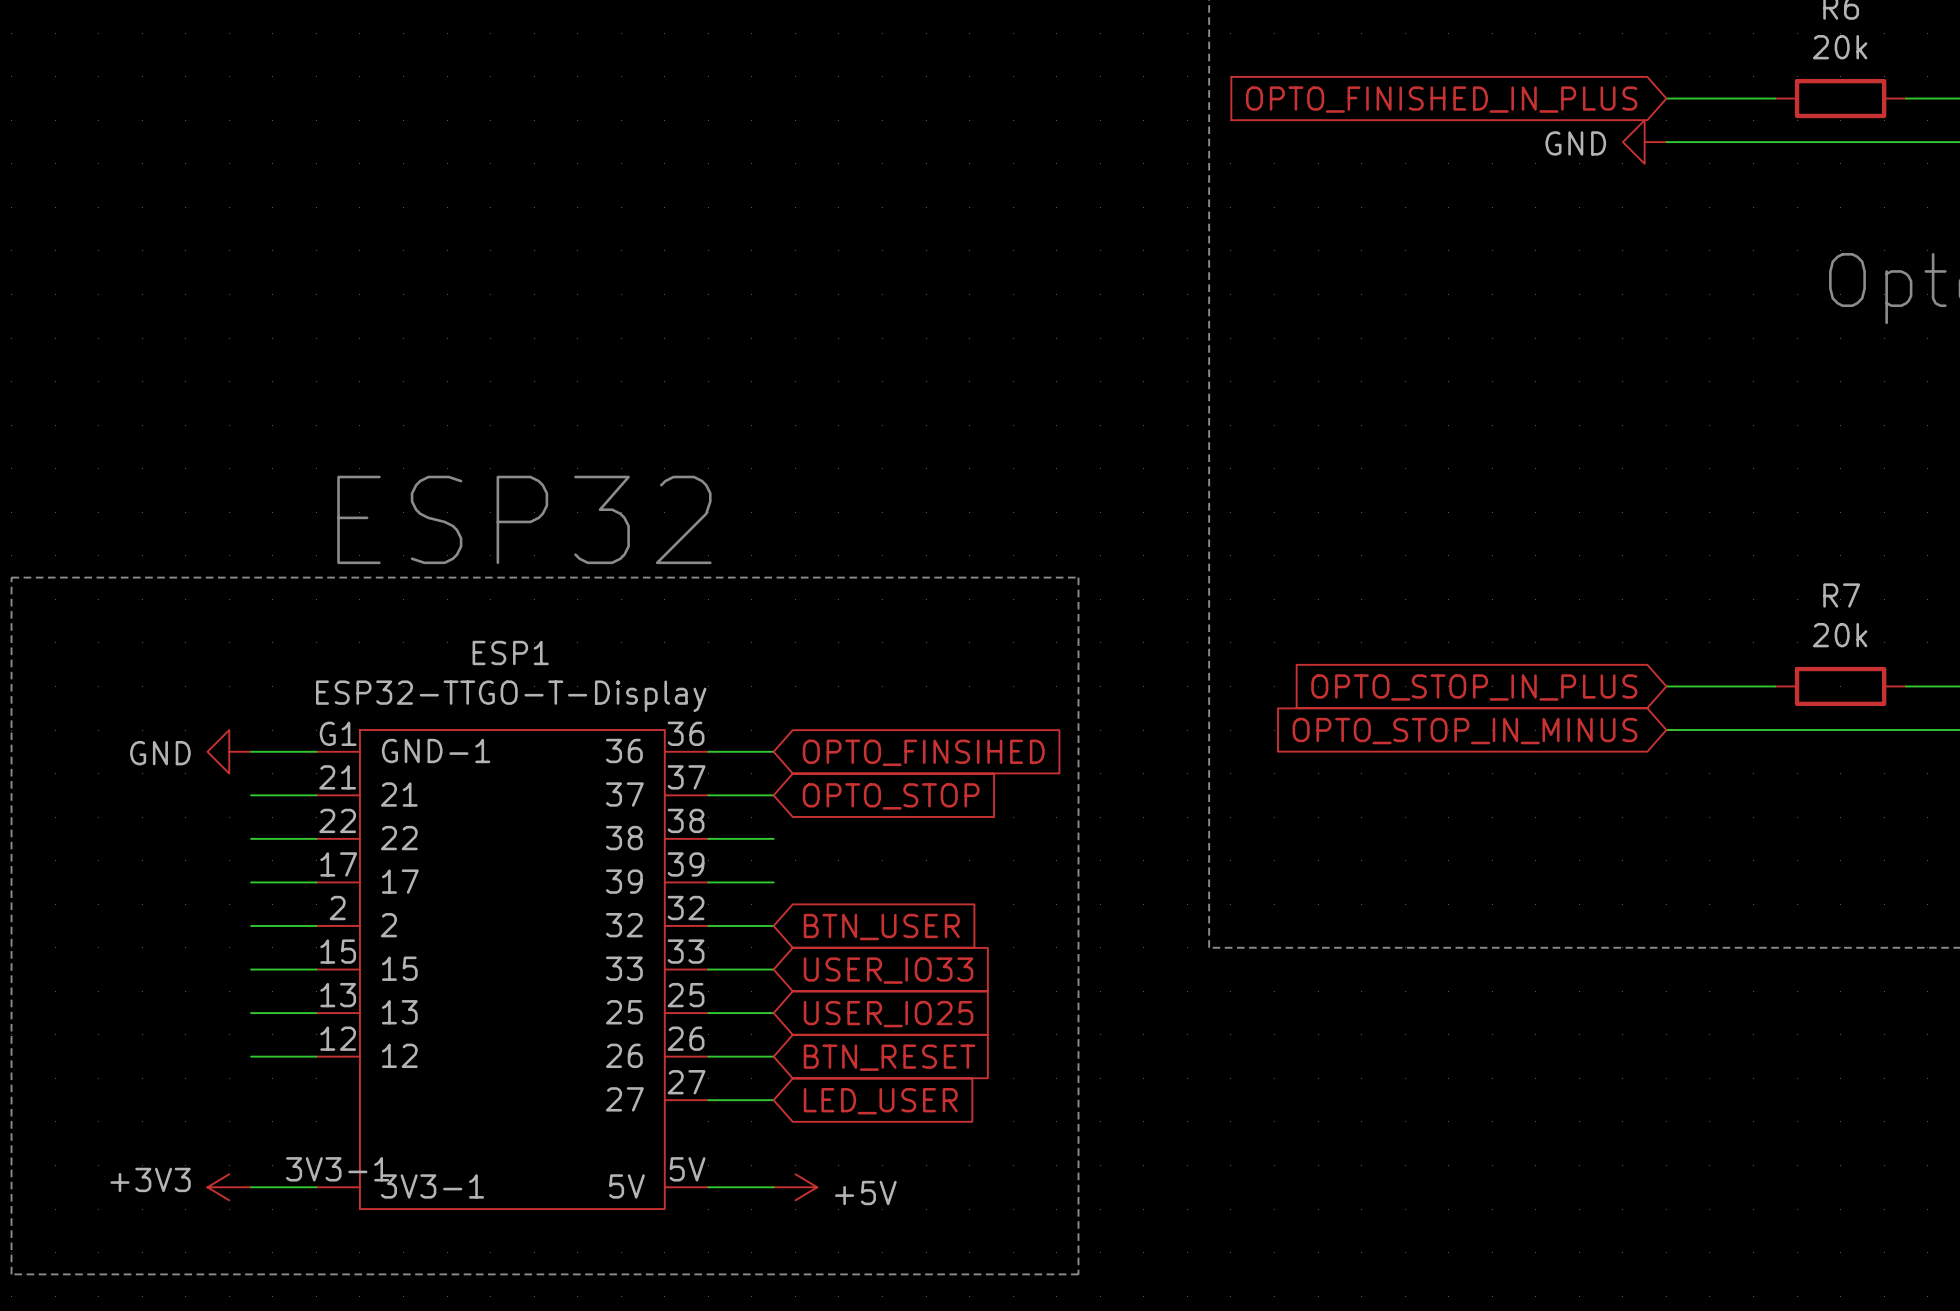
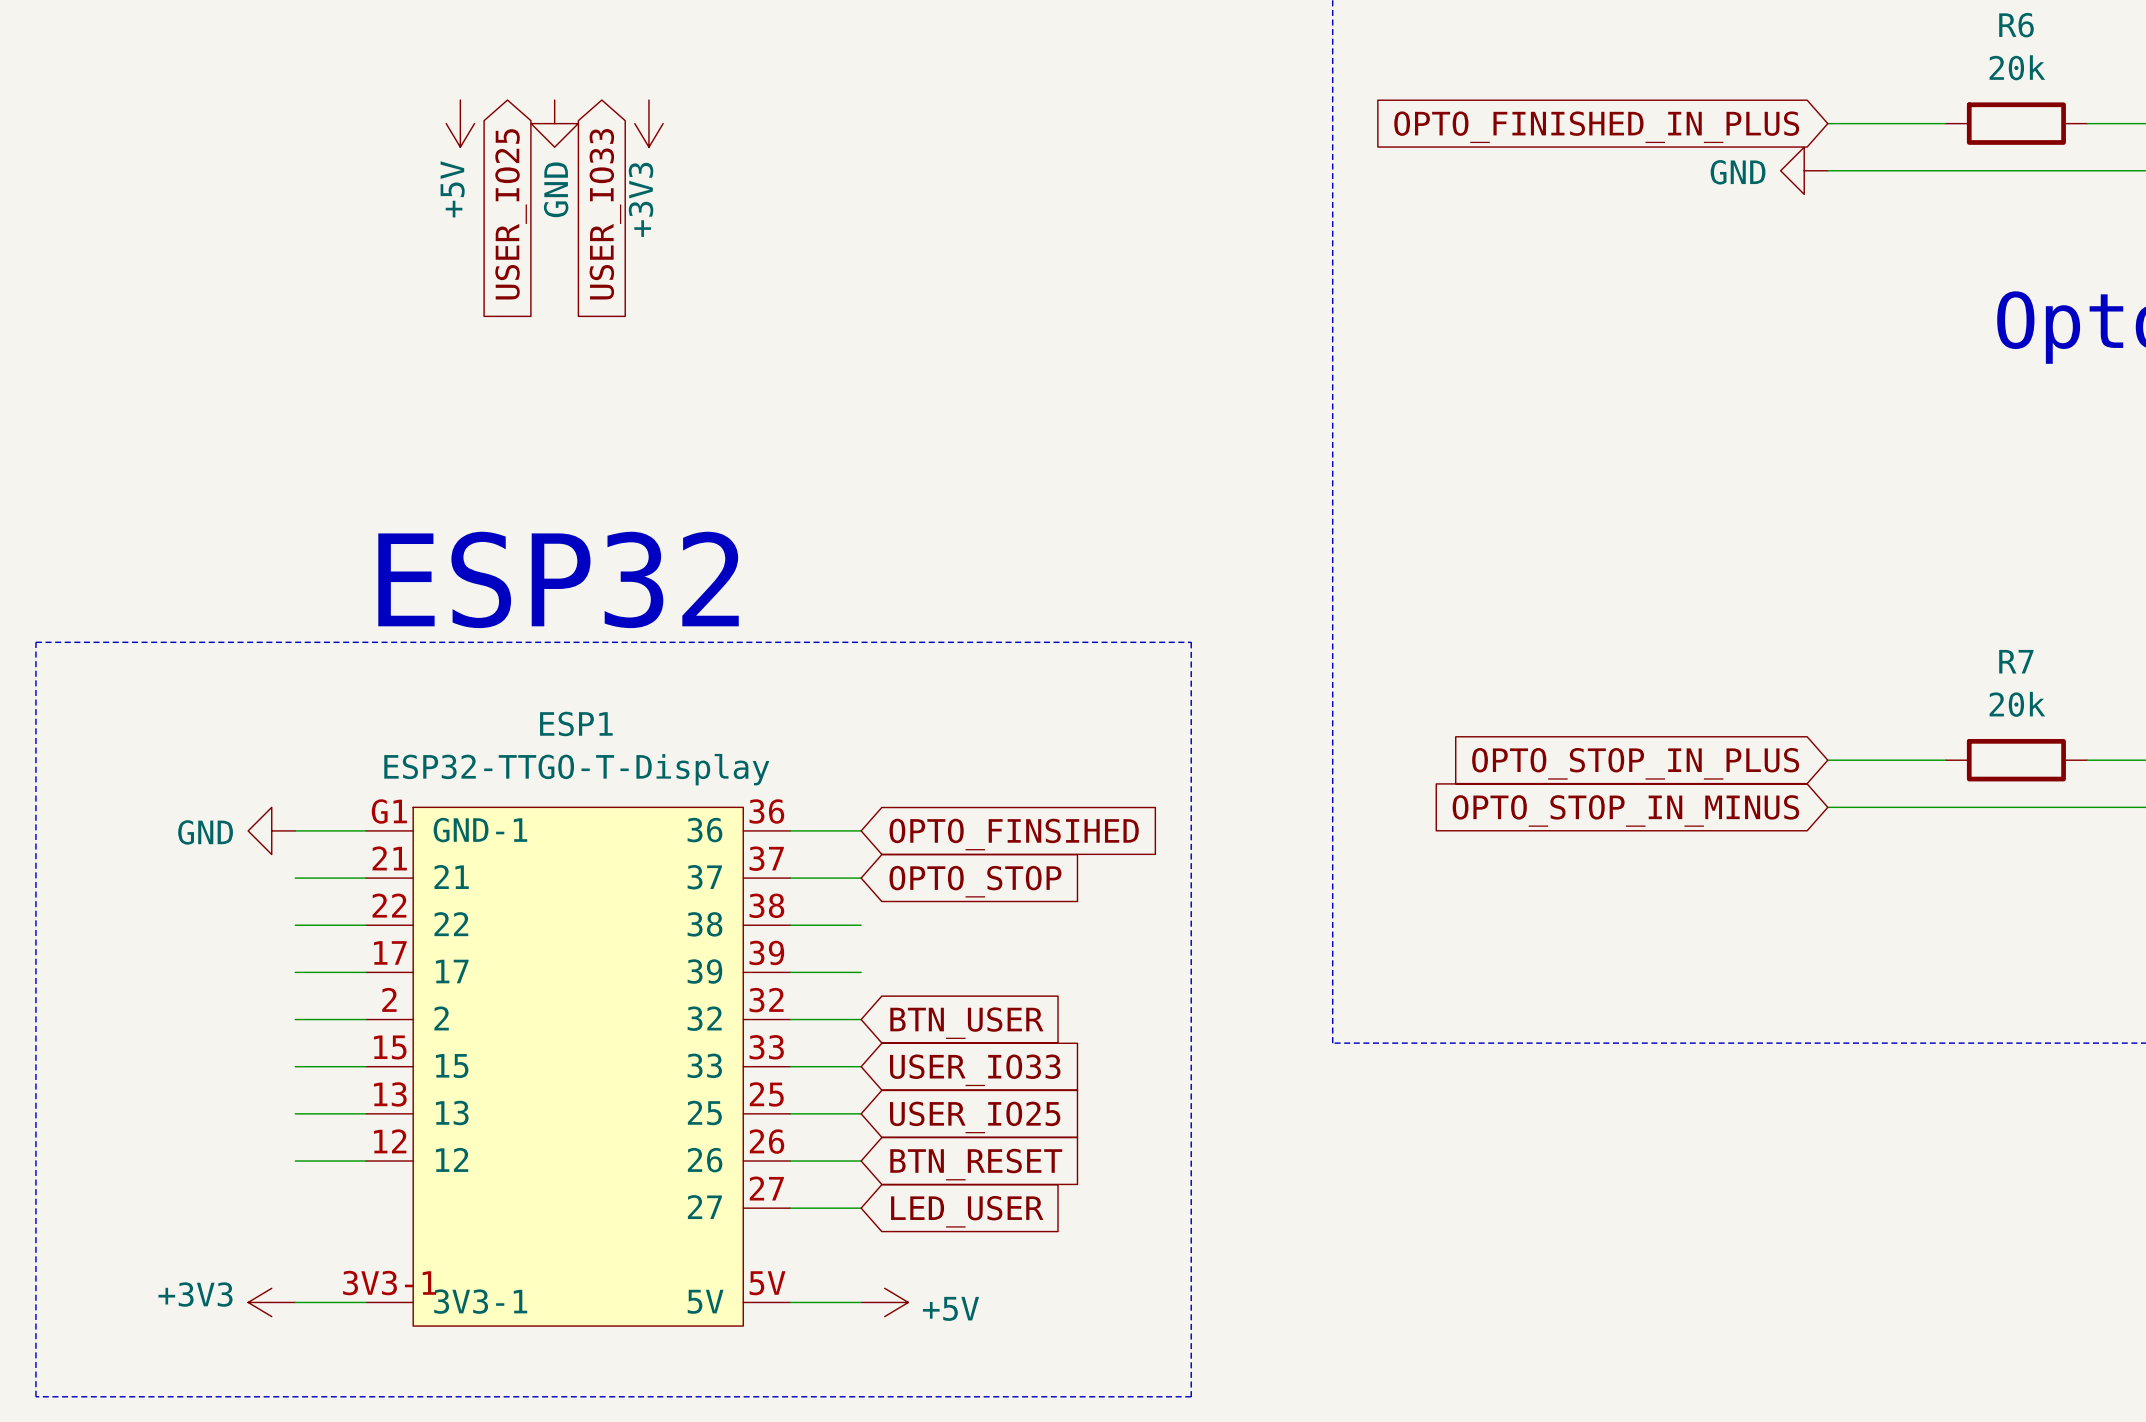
power symbol: none -> +5V (460, 123)
power symbol: none -> GND (554, 123)
power symbol: none -> +3V3 (648, 123)
global label: none -> USER_IO25 (511, 214)
global label: none -> USER_IO33 (605, 214)

